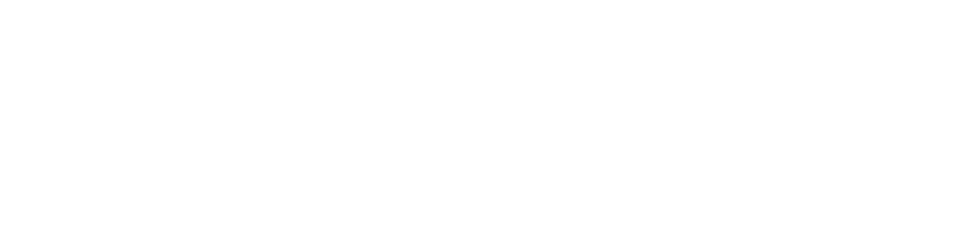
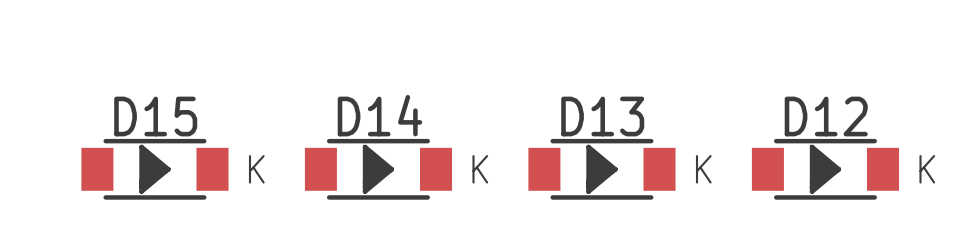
D15: none -> (154, 169)
D14: none -> (378, 169)
D13: none -> (601, 169)
D12: none -> (825, 169)

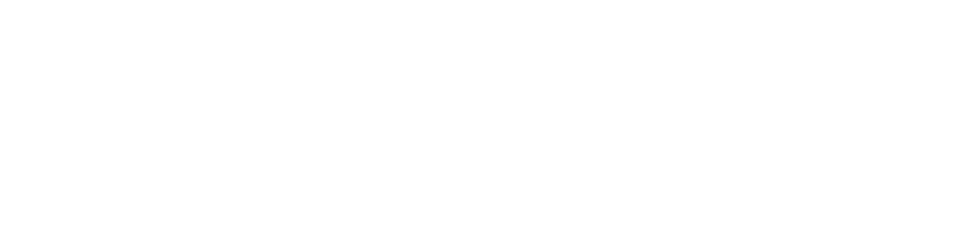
D15: (154, 169) -> none
D14: (378, 169) -> none
D13: (601, 169) -> none
D12: (825, 169) -> none

